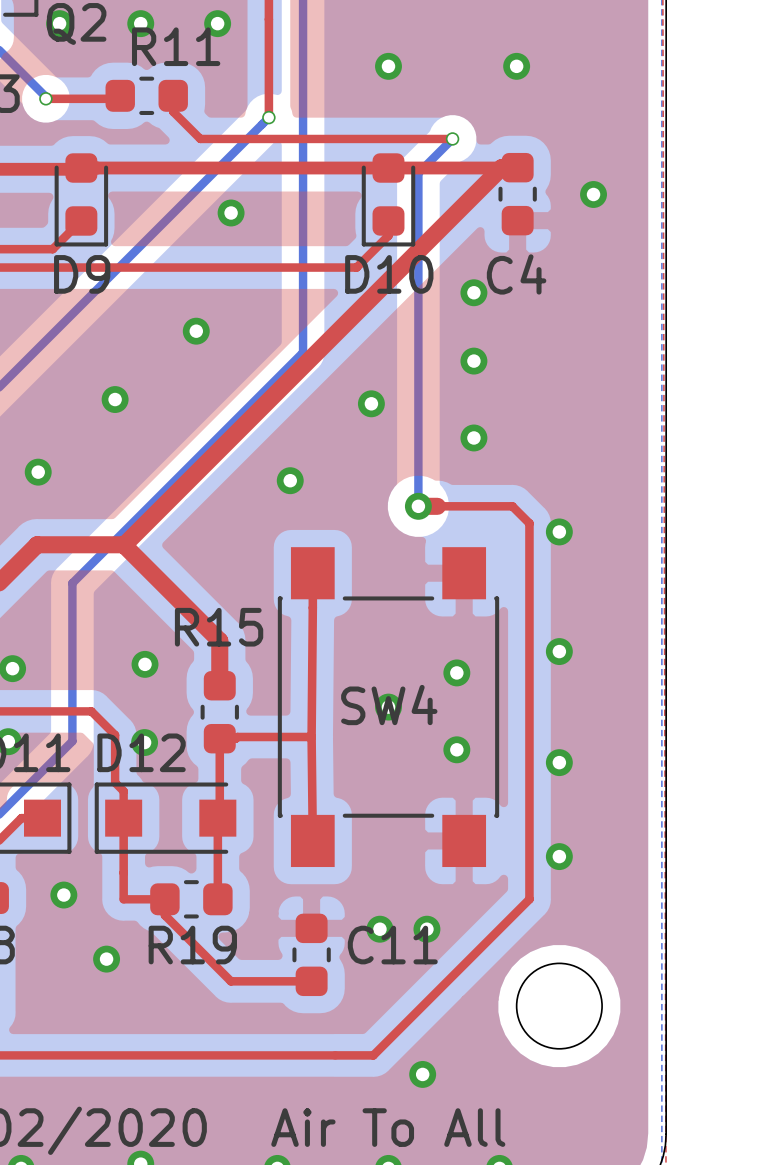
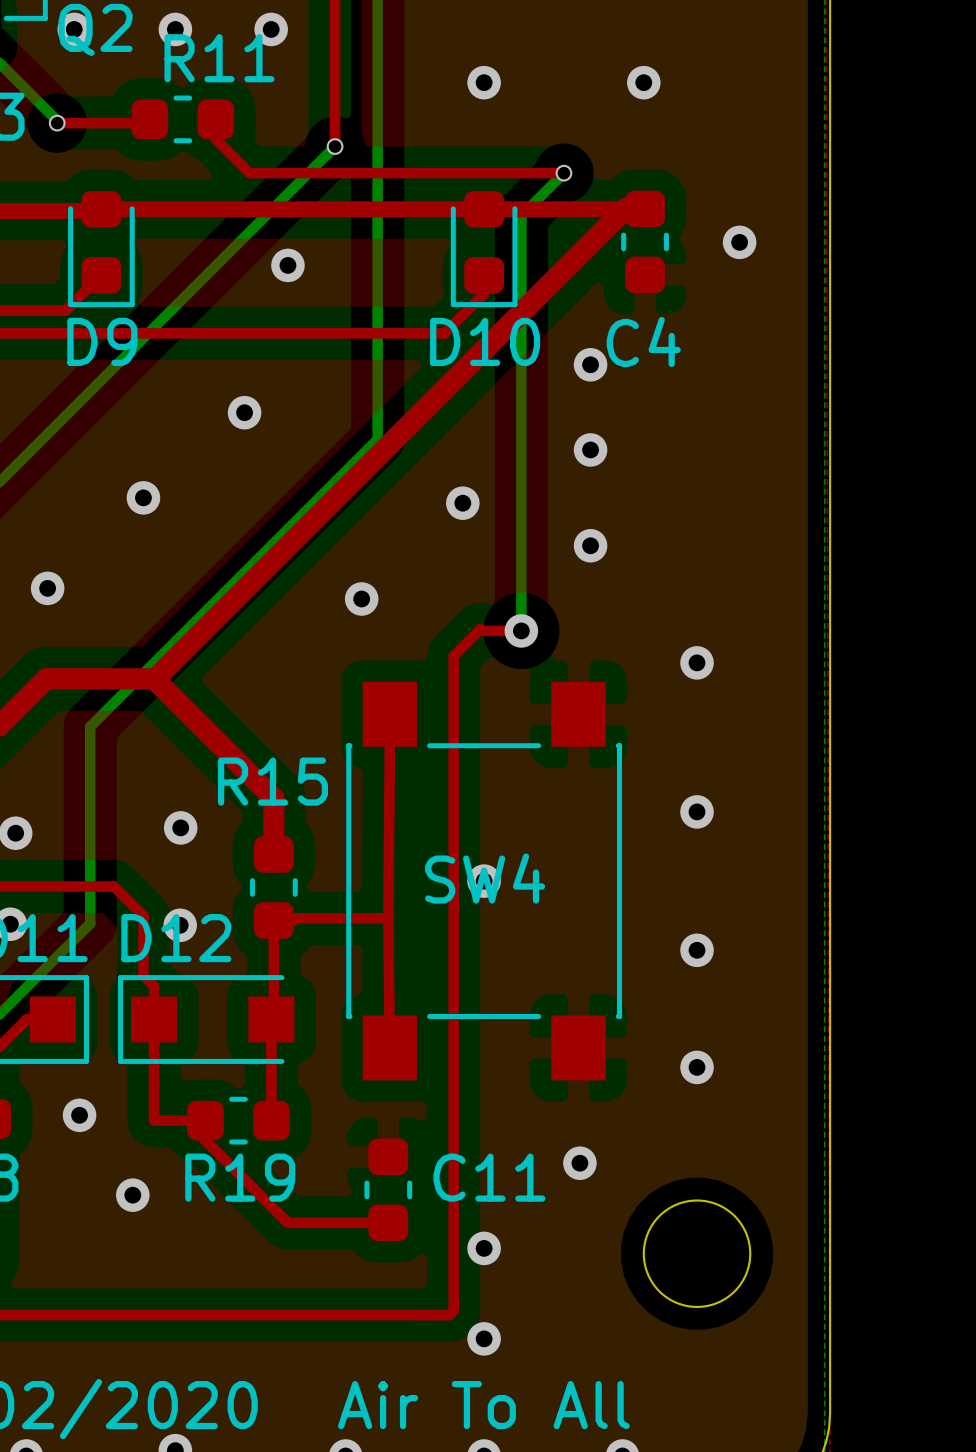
top track: (418, 506) (512, 506) (529, 523) (529, 899) (373, 1055) (360, 1055) -> (521, 630) (480, 629) (453, 656) (453, 1310) (449, 1315)
via: (456, 672) -> none
via: (456, 749) -> none
via: (379, 929) -> none
via position: (426, 929) -> (579, 1163)
via: none -> (484, 1248)
via position: (422, 1074) -> (484, 1338)

